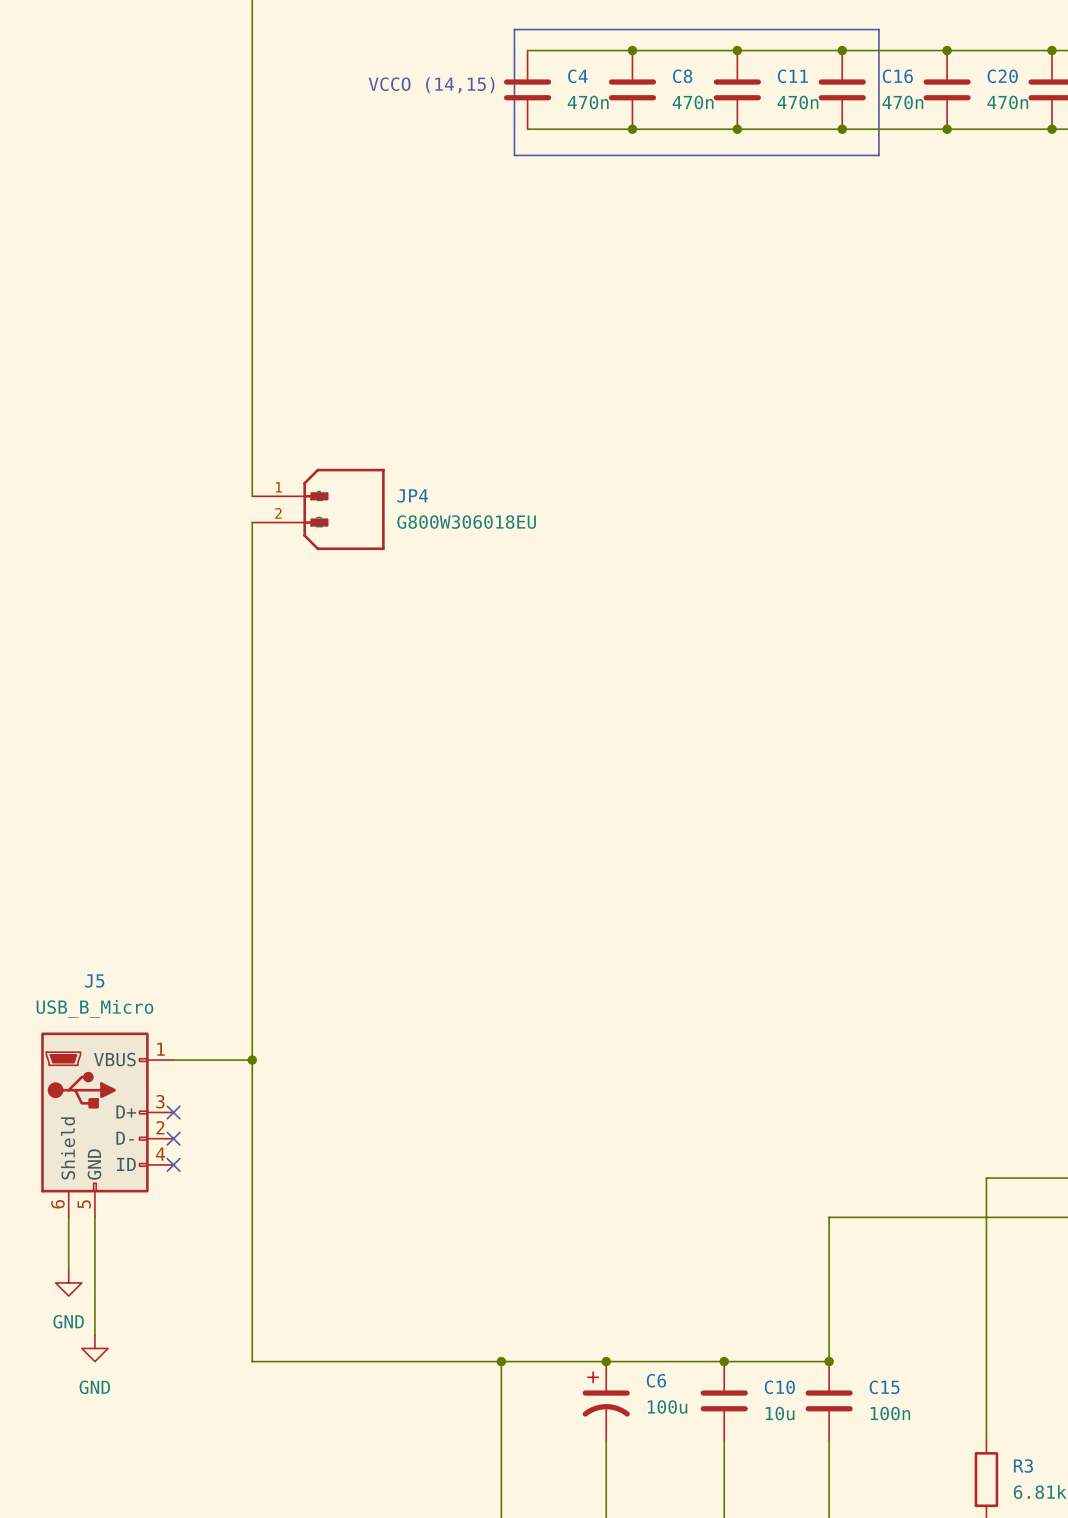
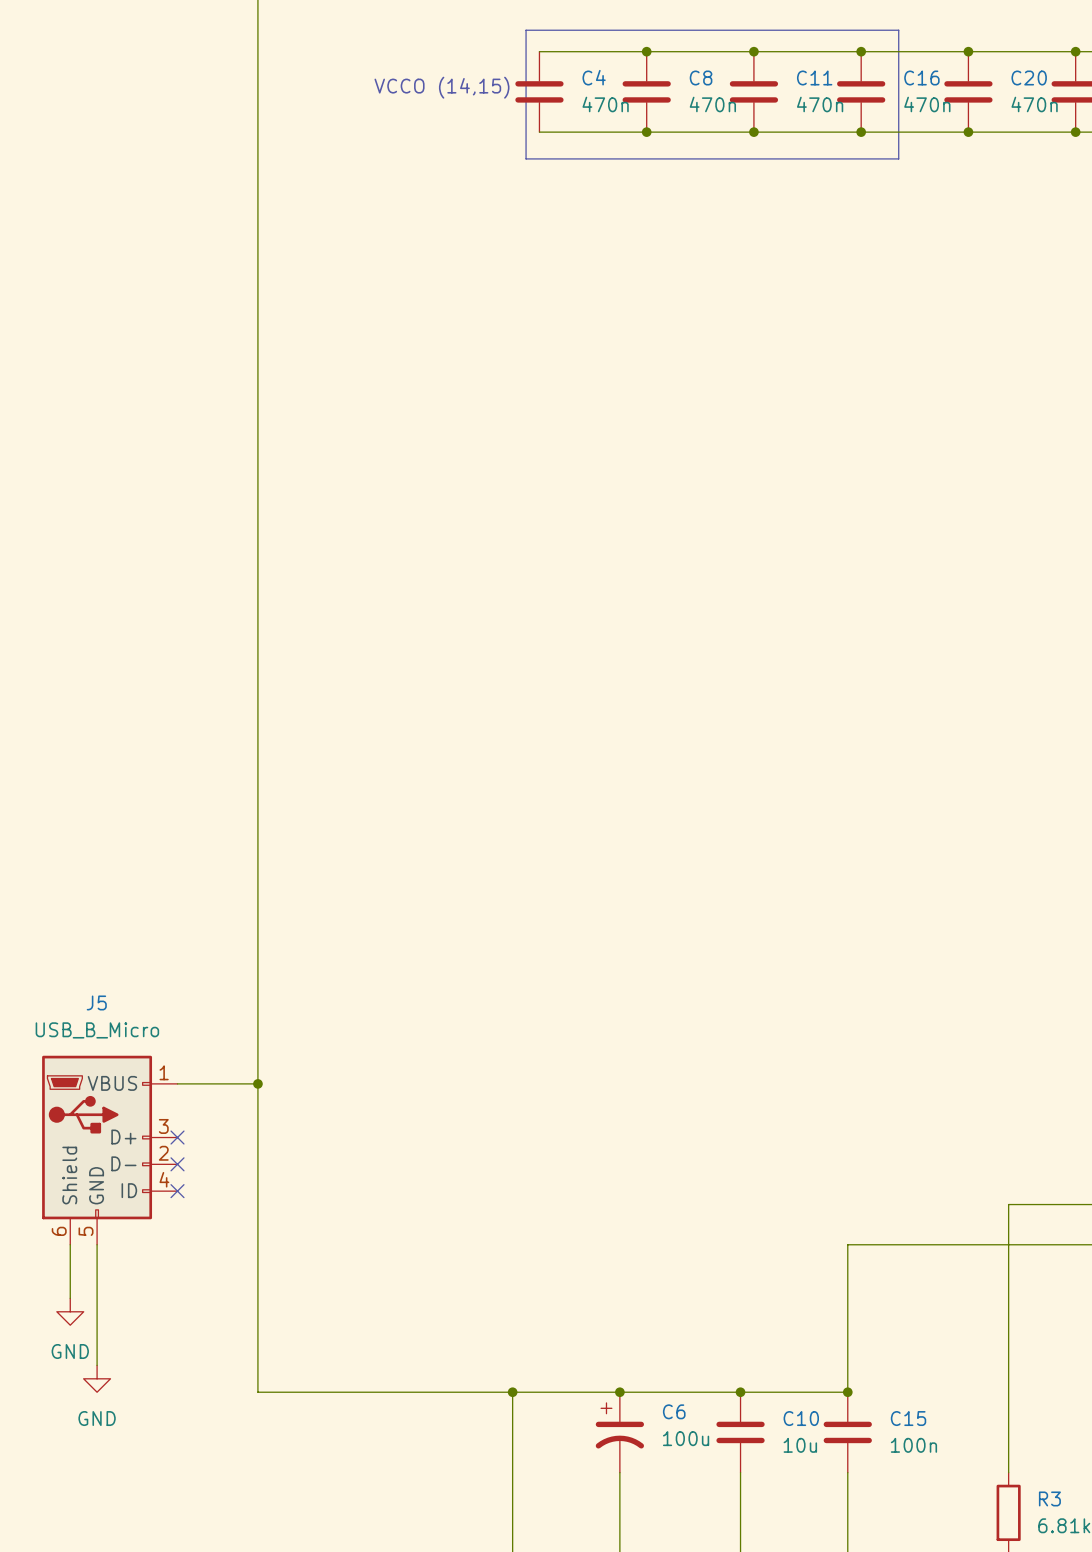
wire: none -> (257, 507) (257, 534)
JP4: G800W306018EU (318, 509) -> none

